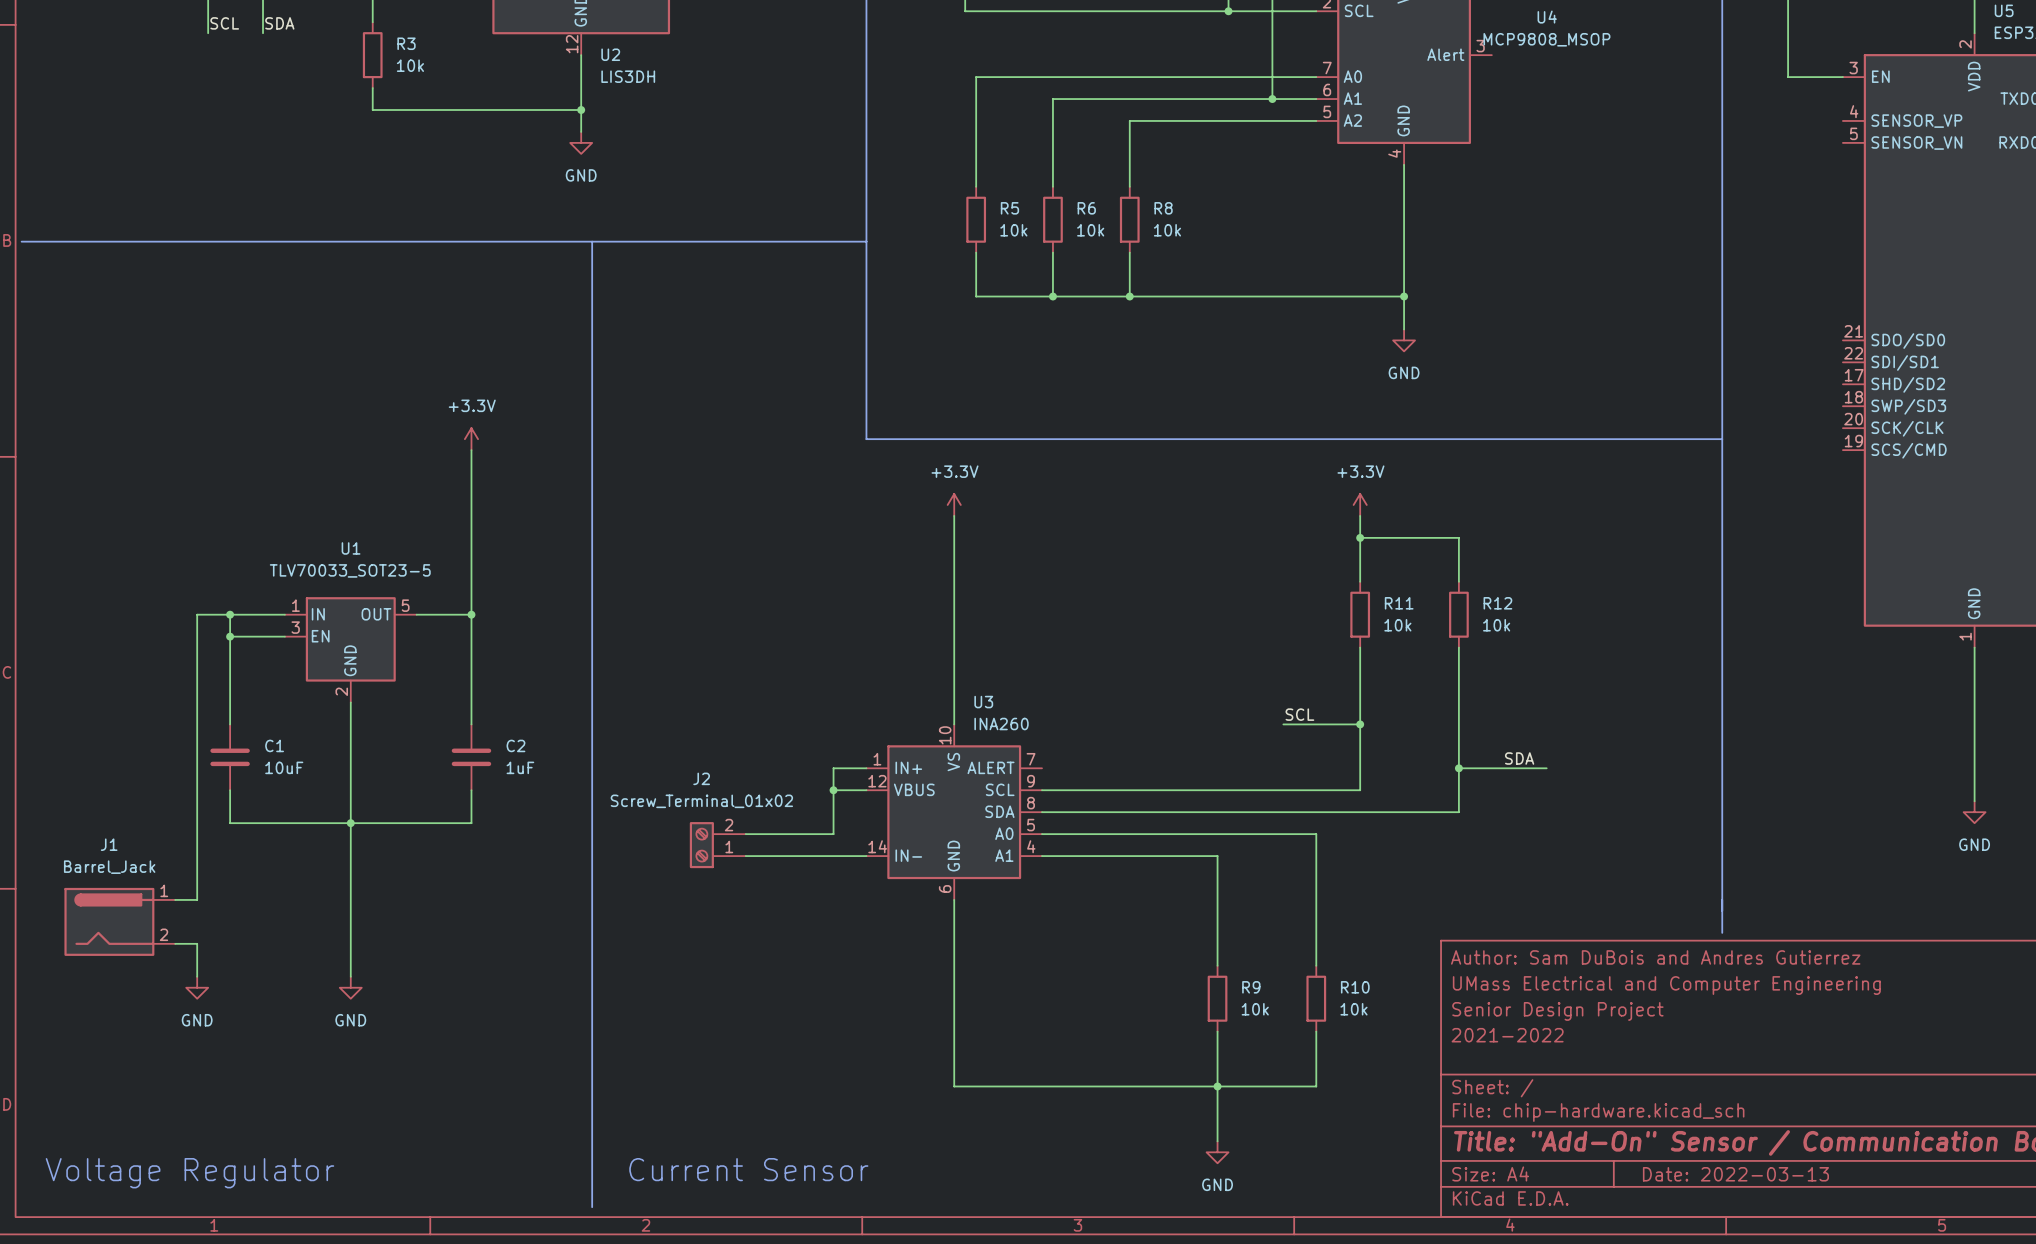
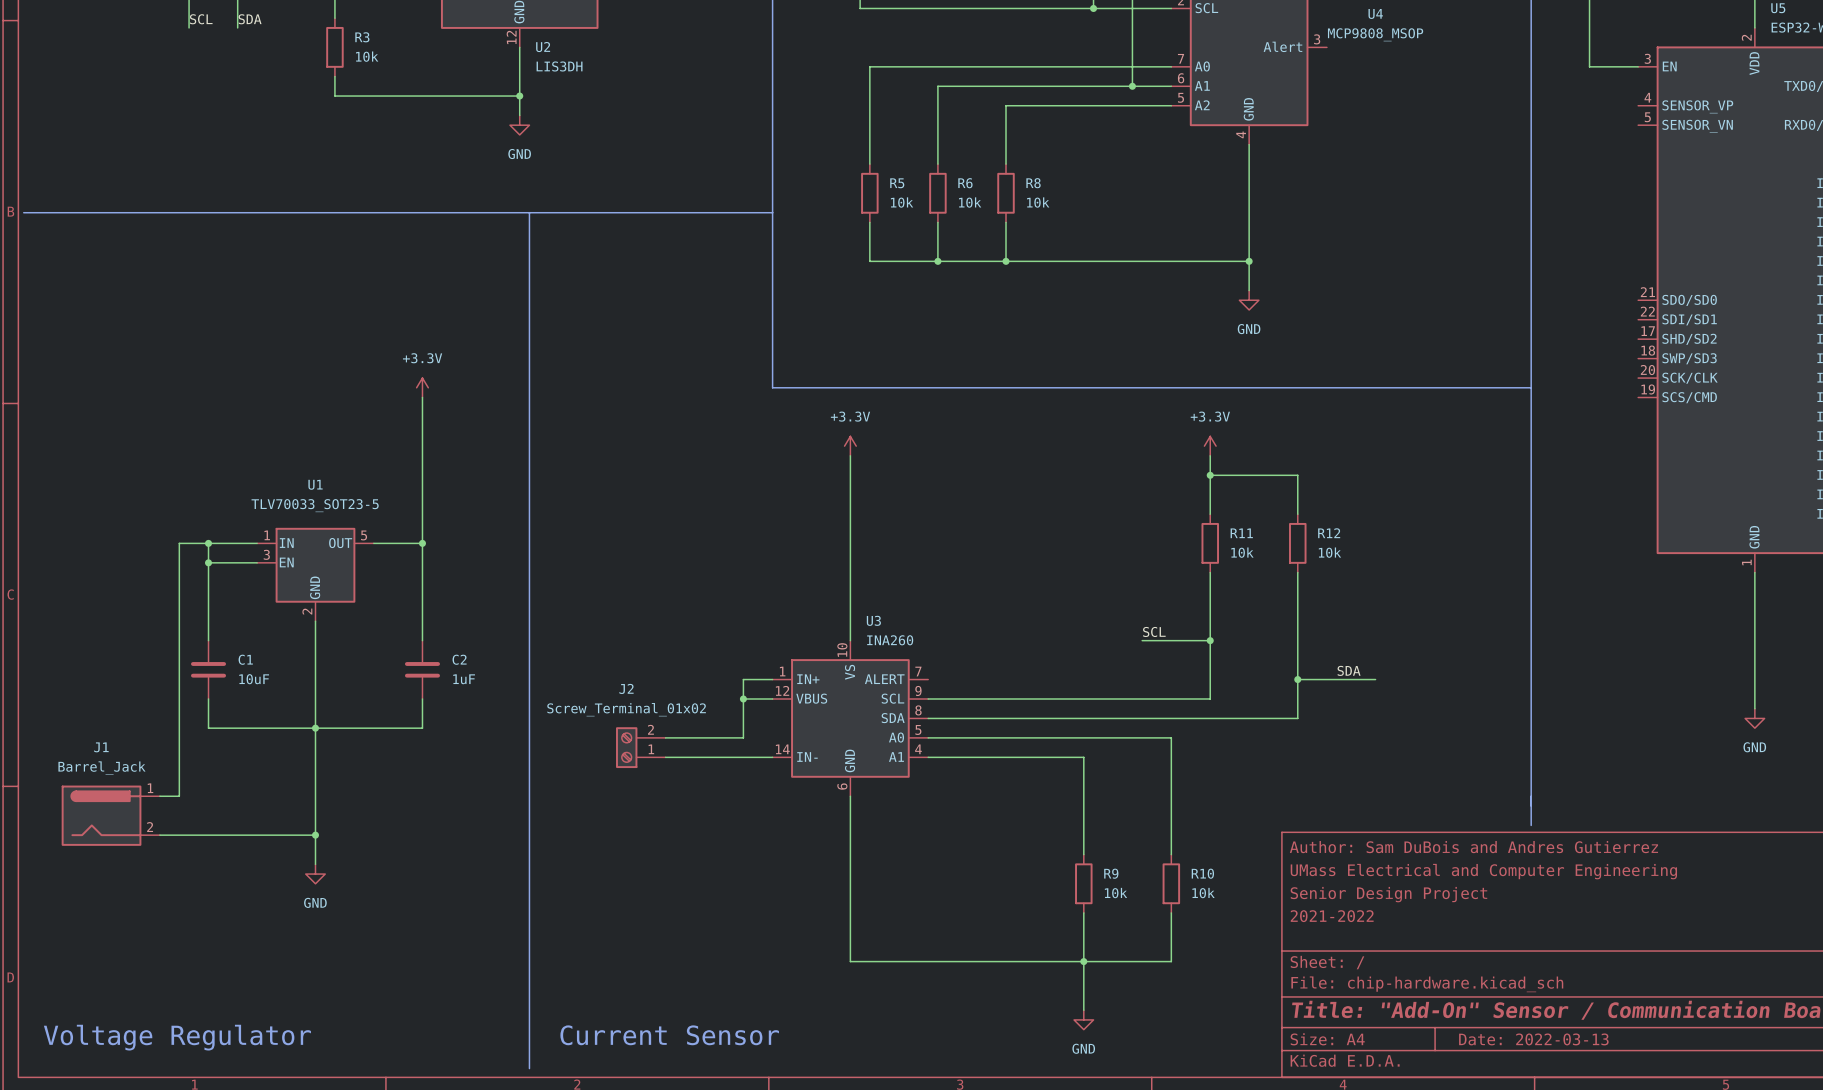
wire: (197, 943) (197, 976) -> (179, 835) (315, 835)
junction: none -> (315, 835)
power symbol: GND (197, 987) -> none

